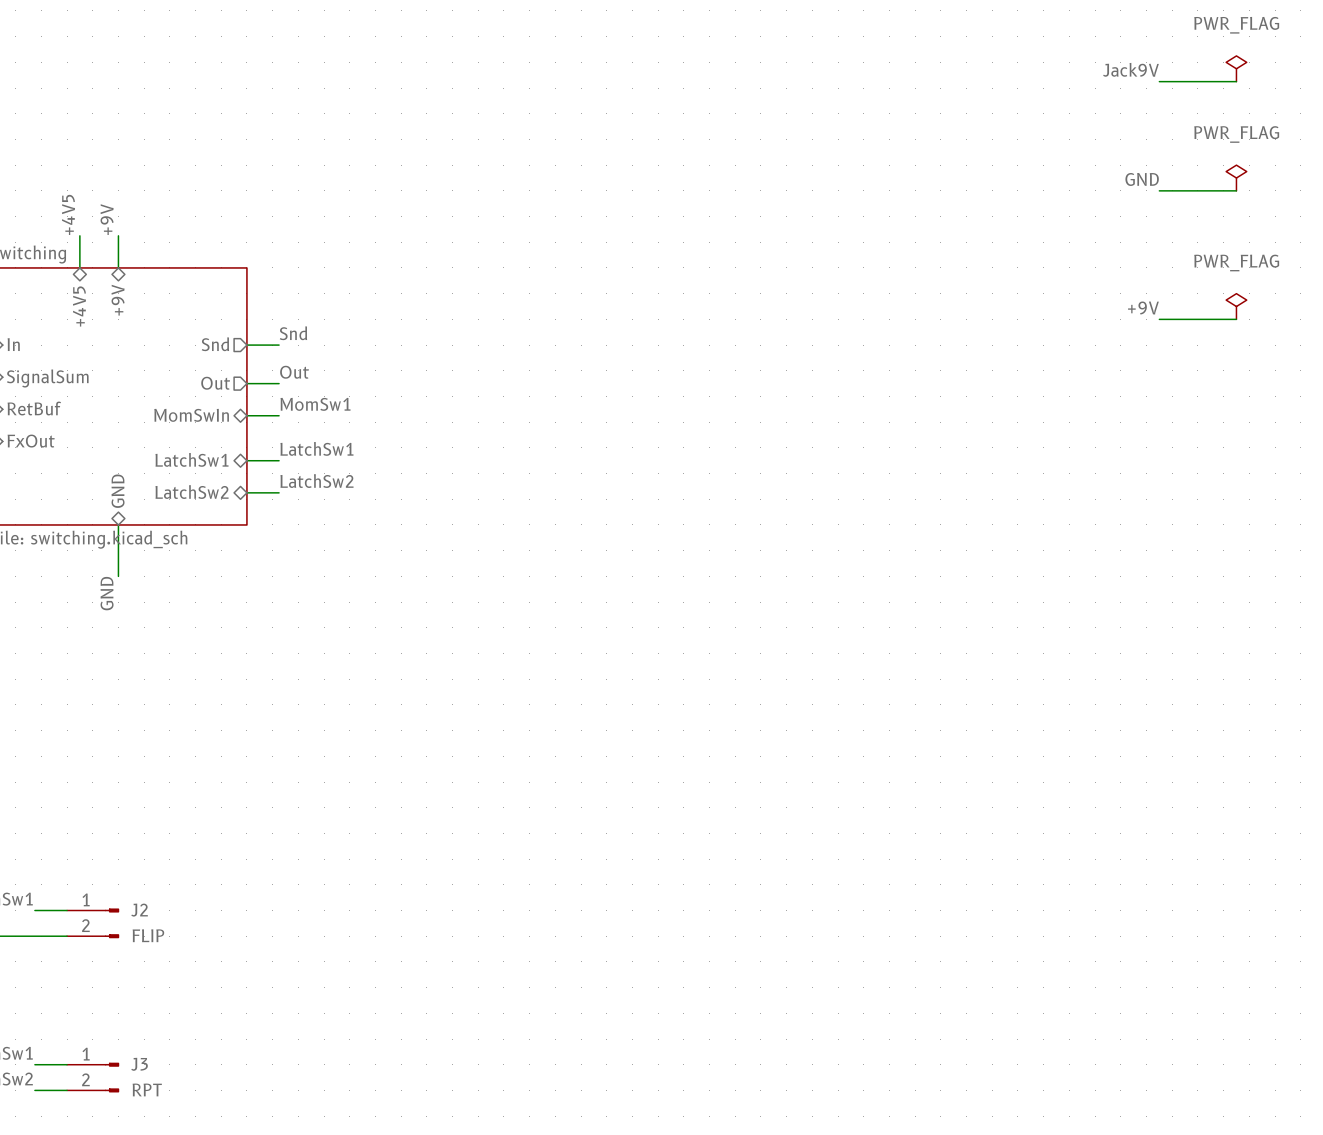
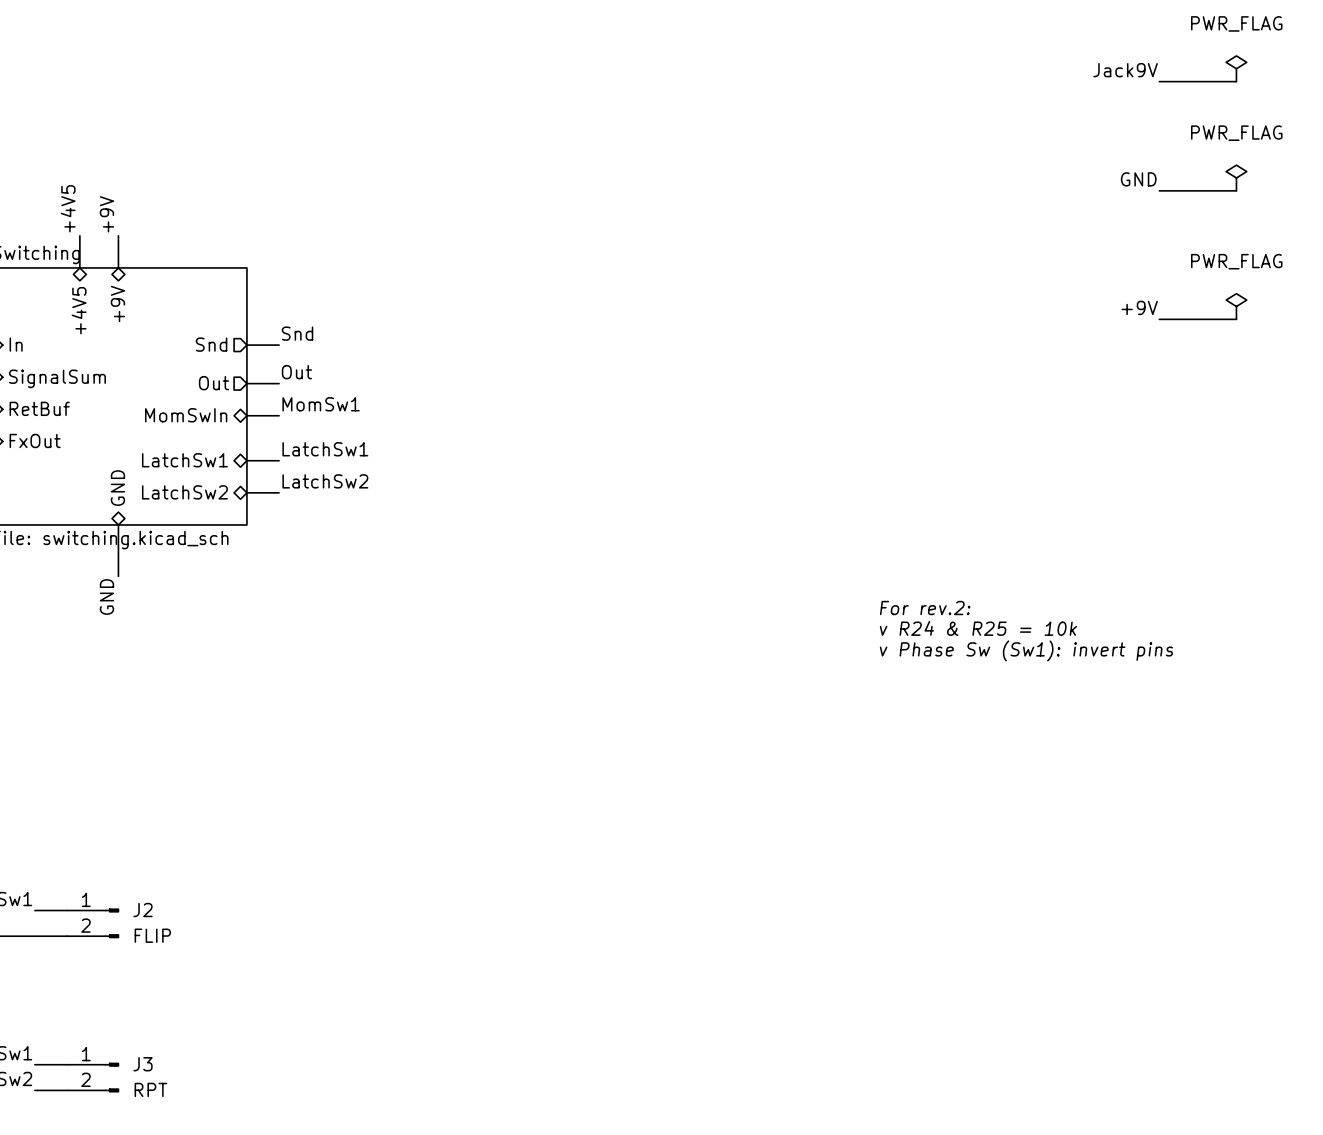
text: none -> For rev.2: (925, 608)
text: none -> v R24 & R25 = 10k (978, 628)
text: none -> v Phase Sw (Sw1): invert pins (1026, 650)

